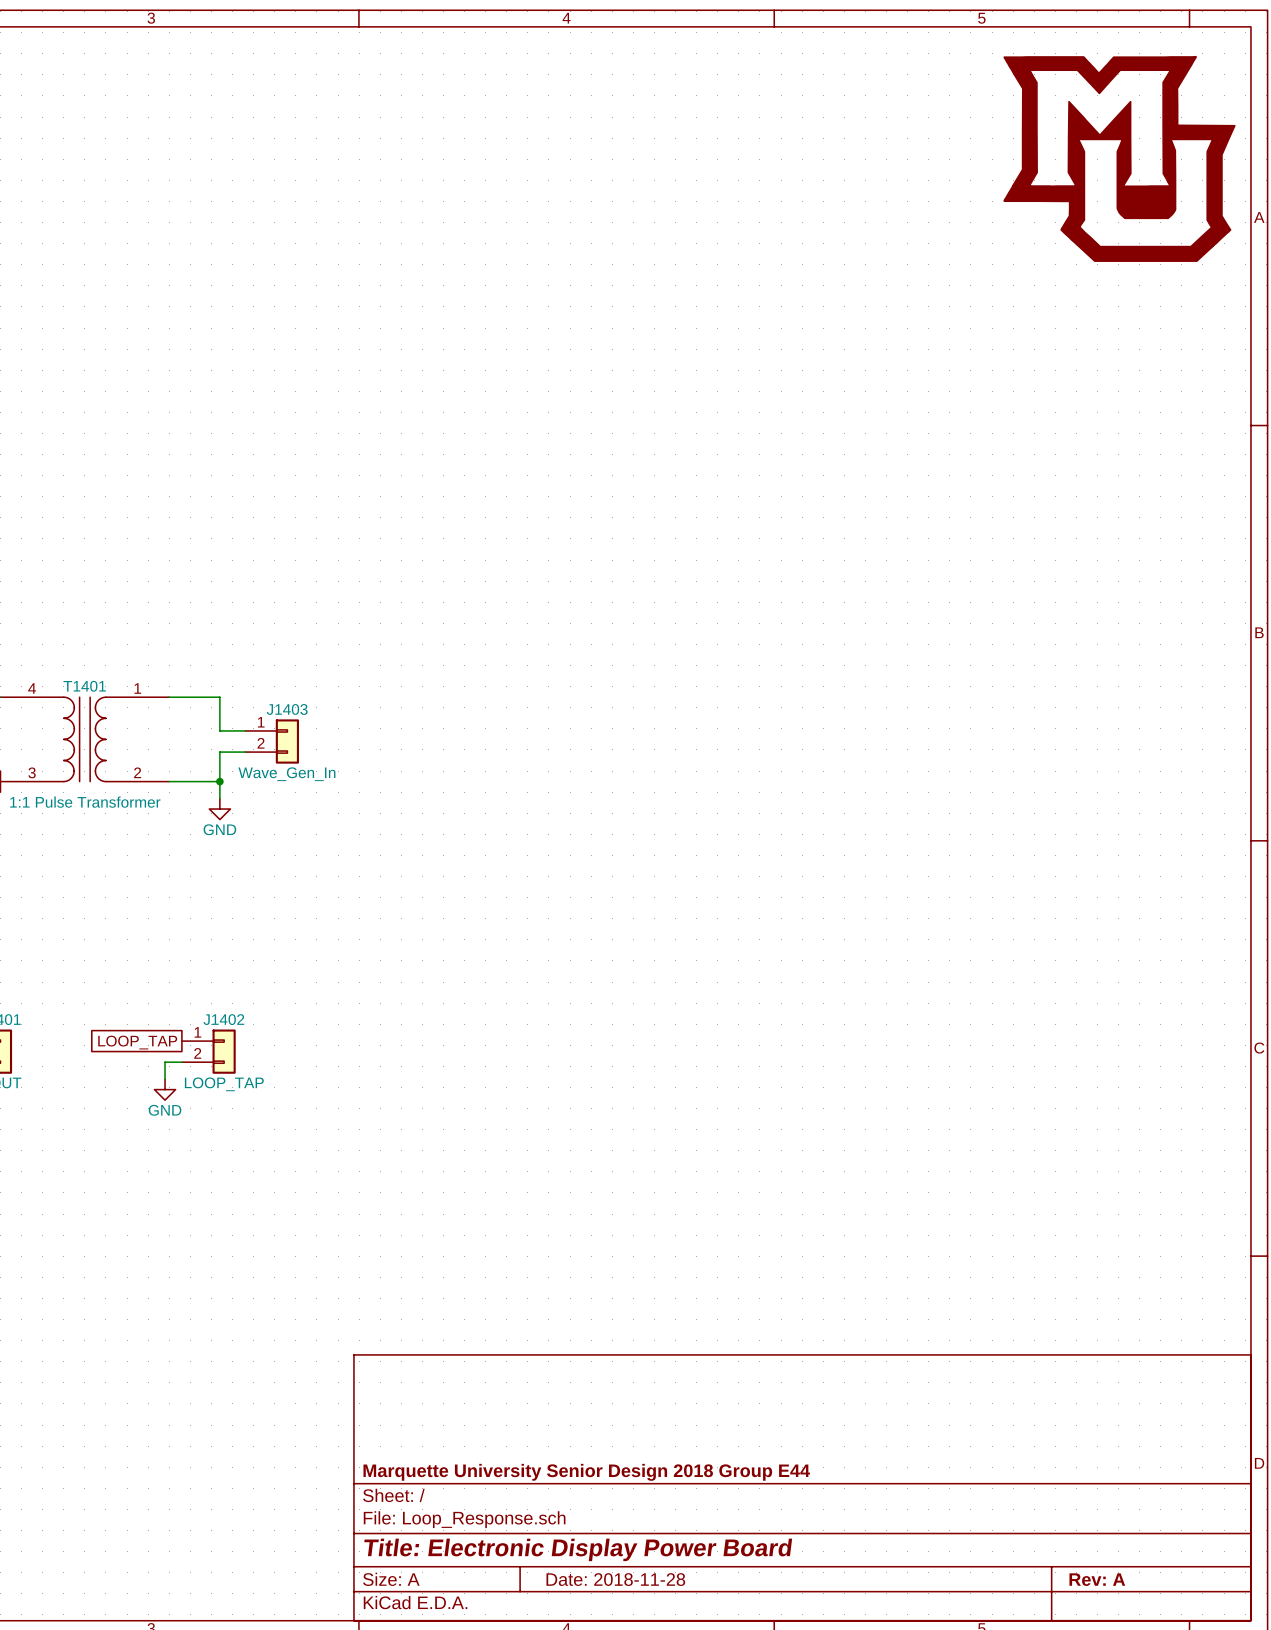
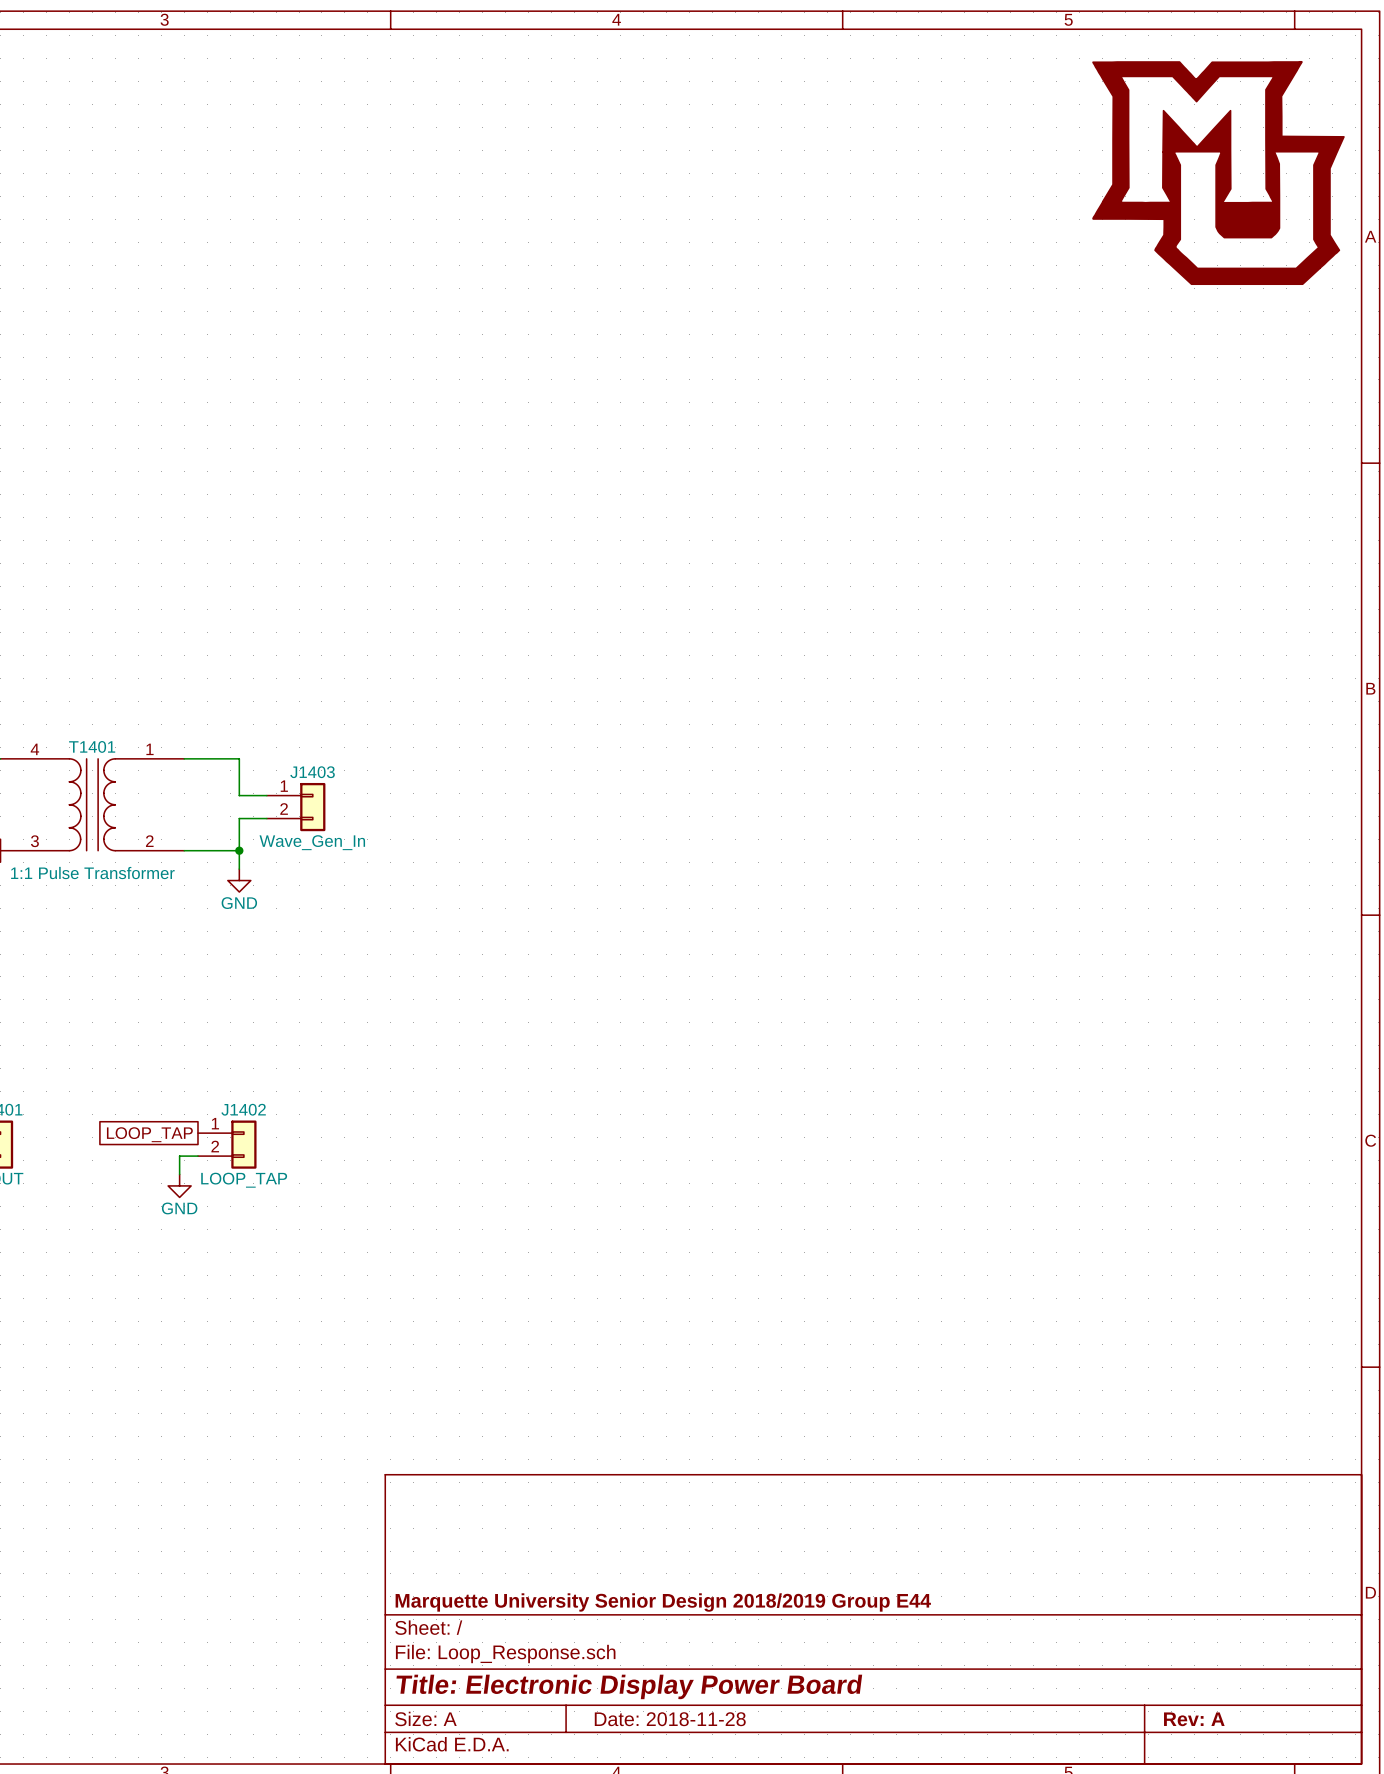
title block: Marquette University Senior Design 2018 Group E44 (586, 1472) -> Marquette University Senior Design 2018/2019 Group E44 (663, 1602)

